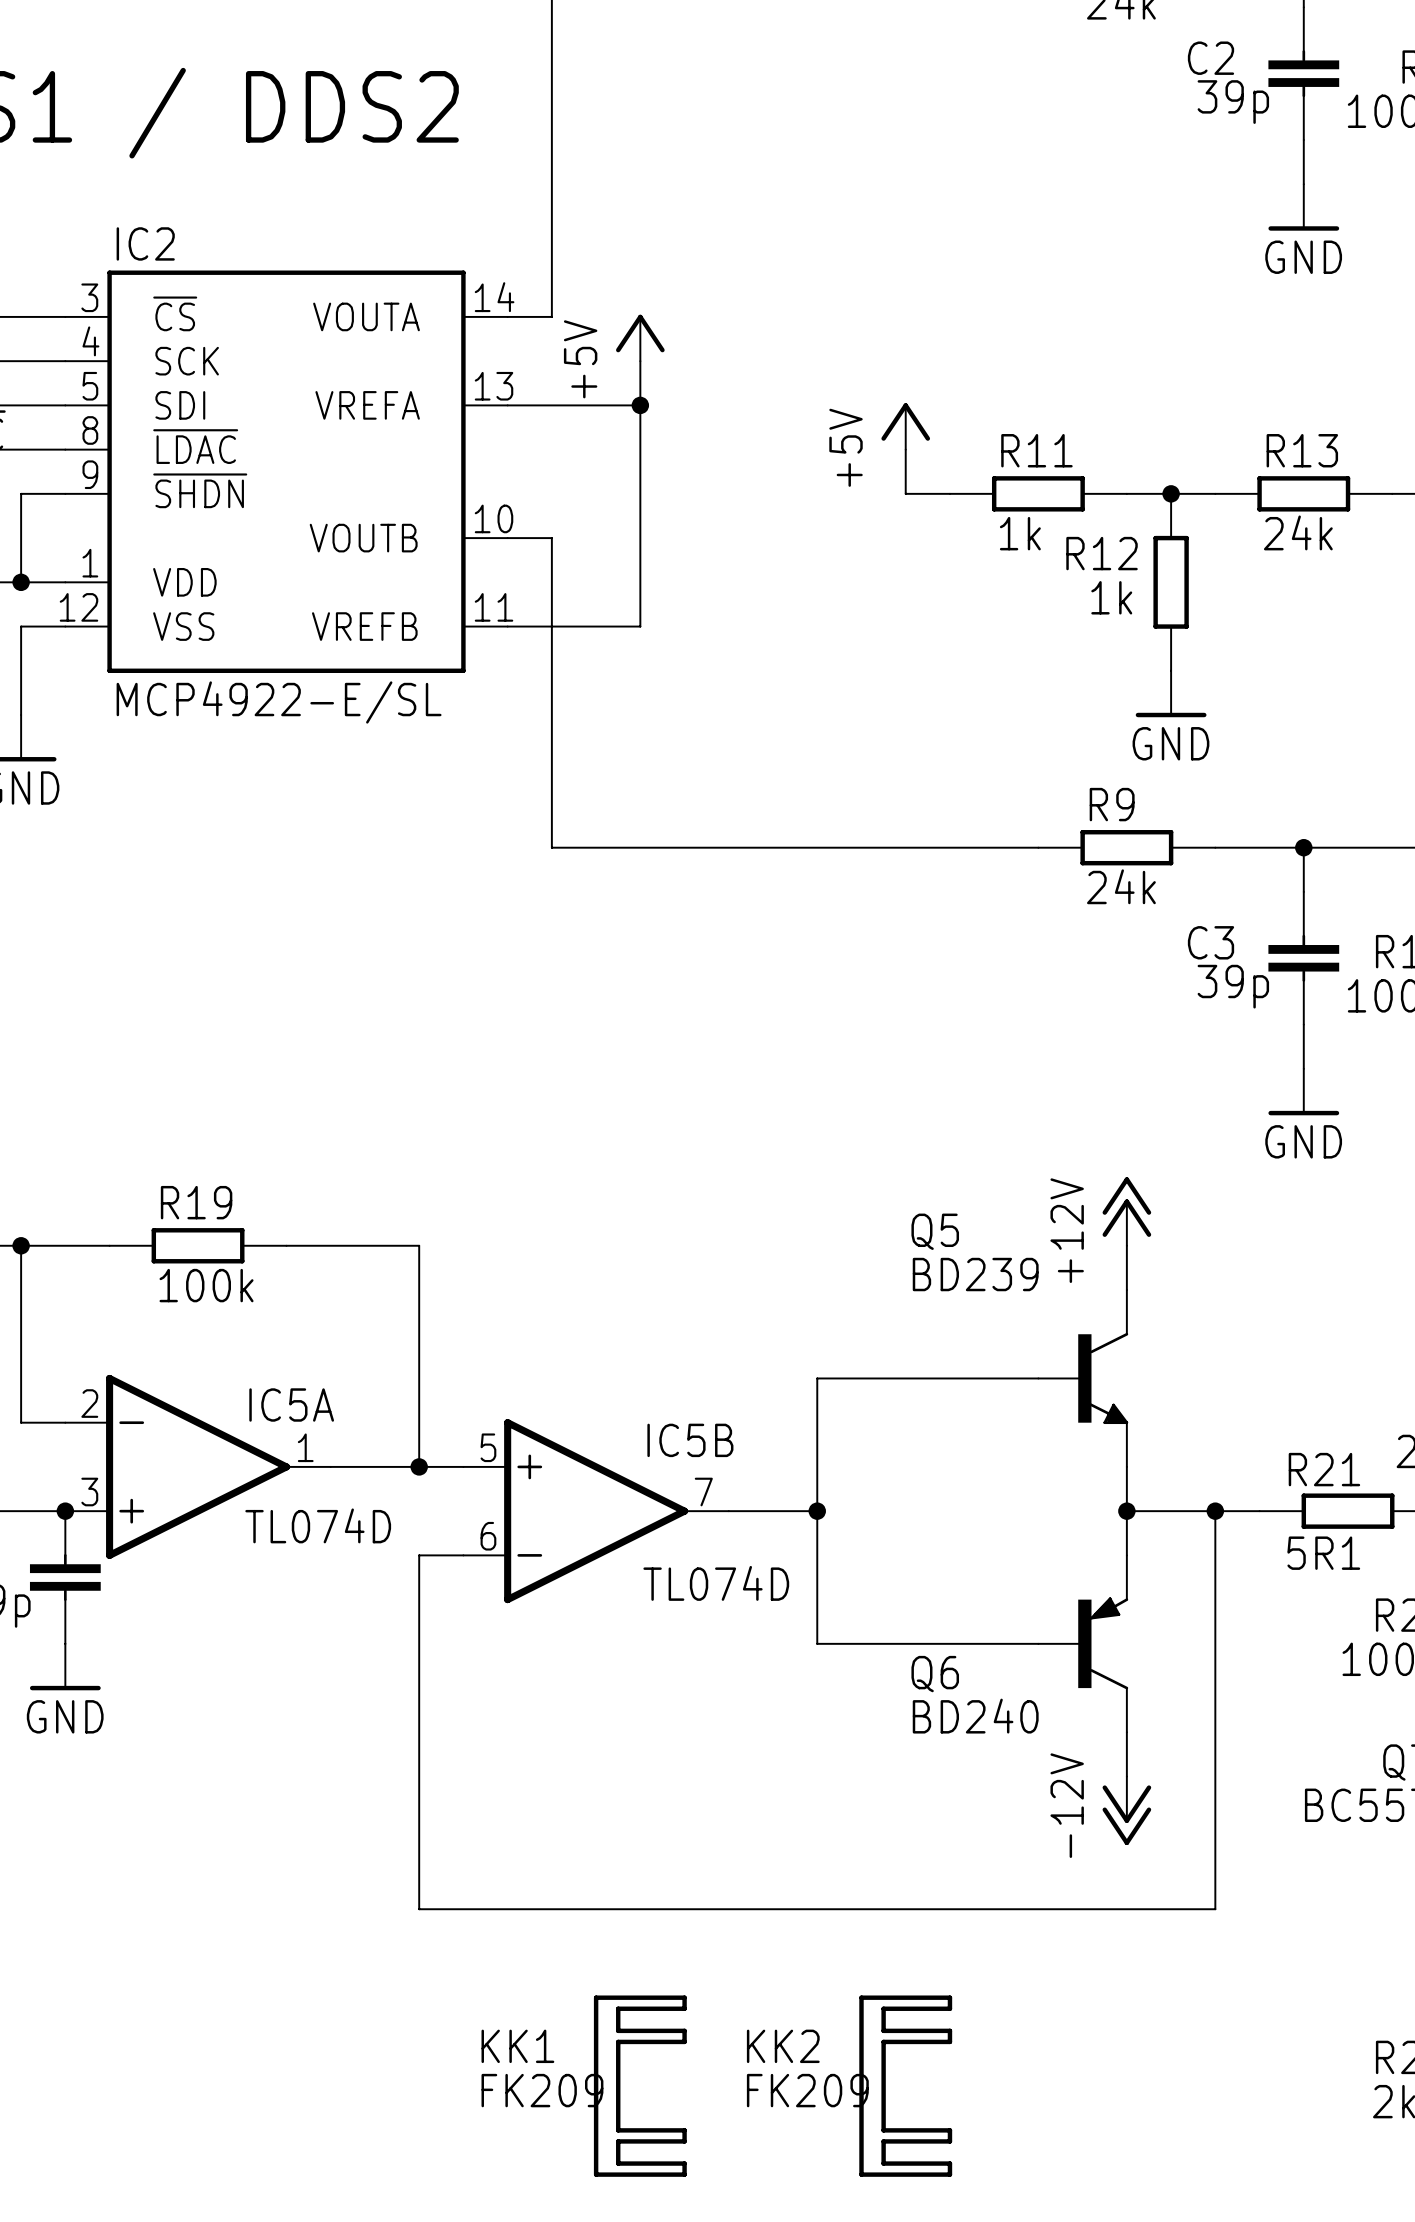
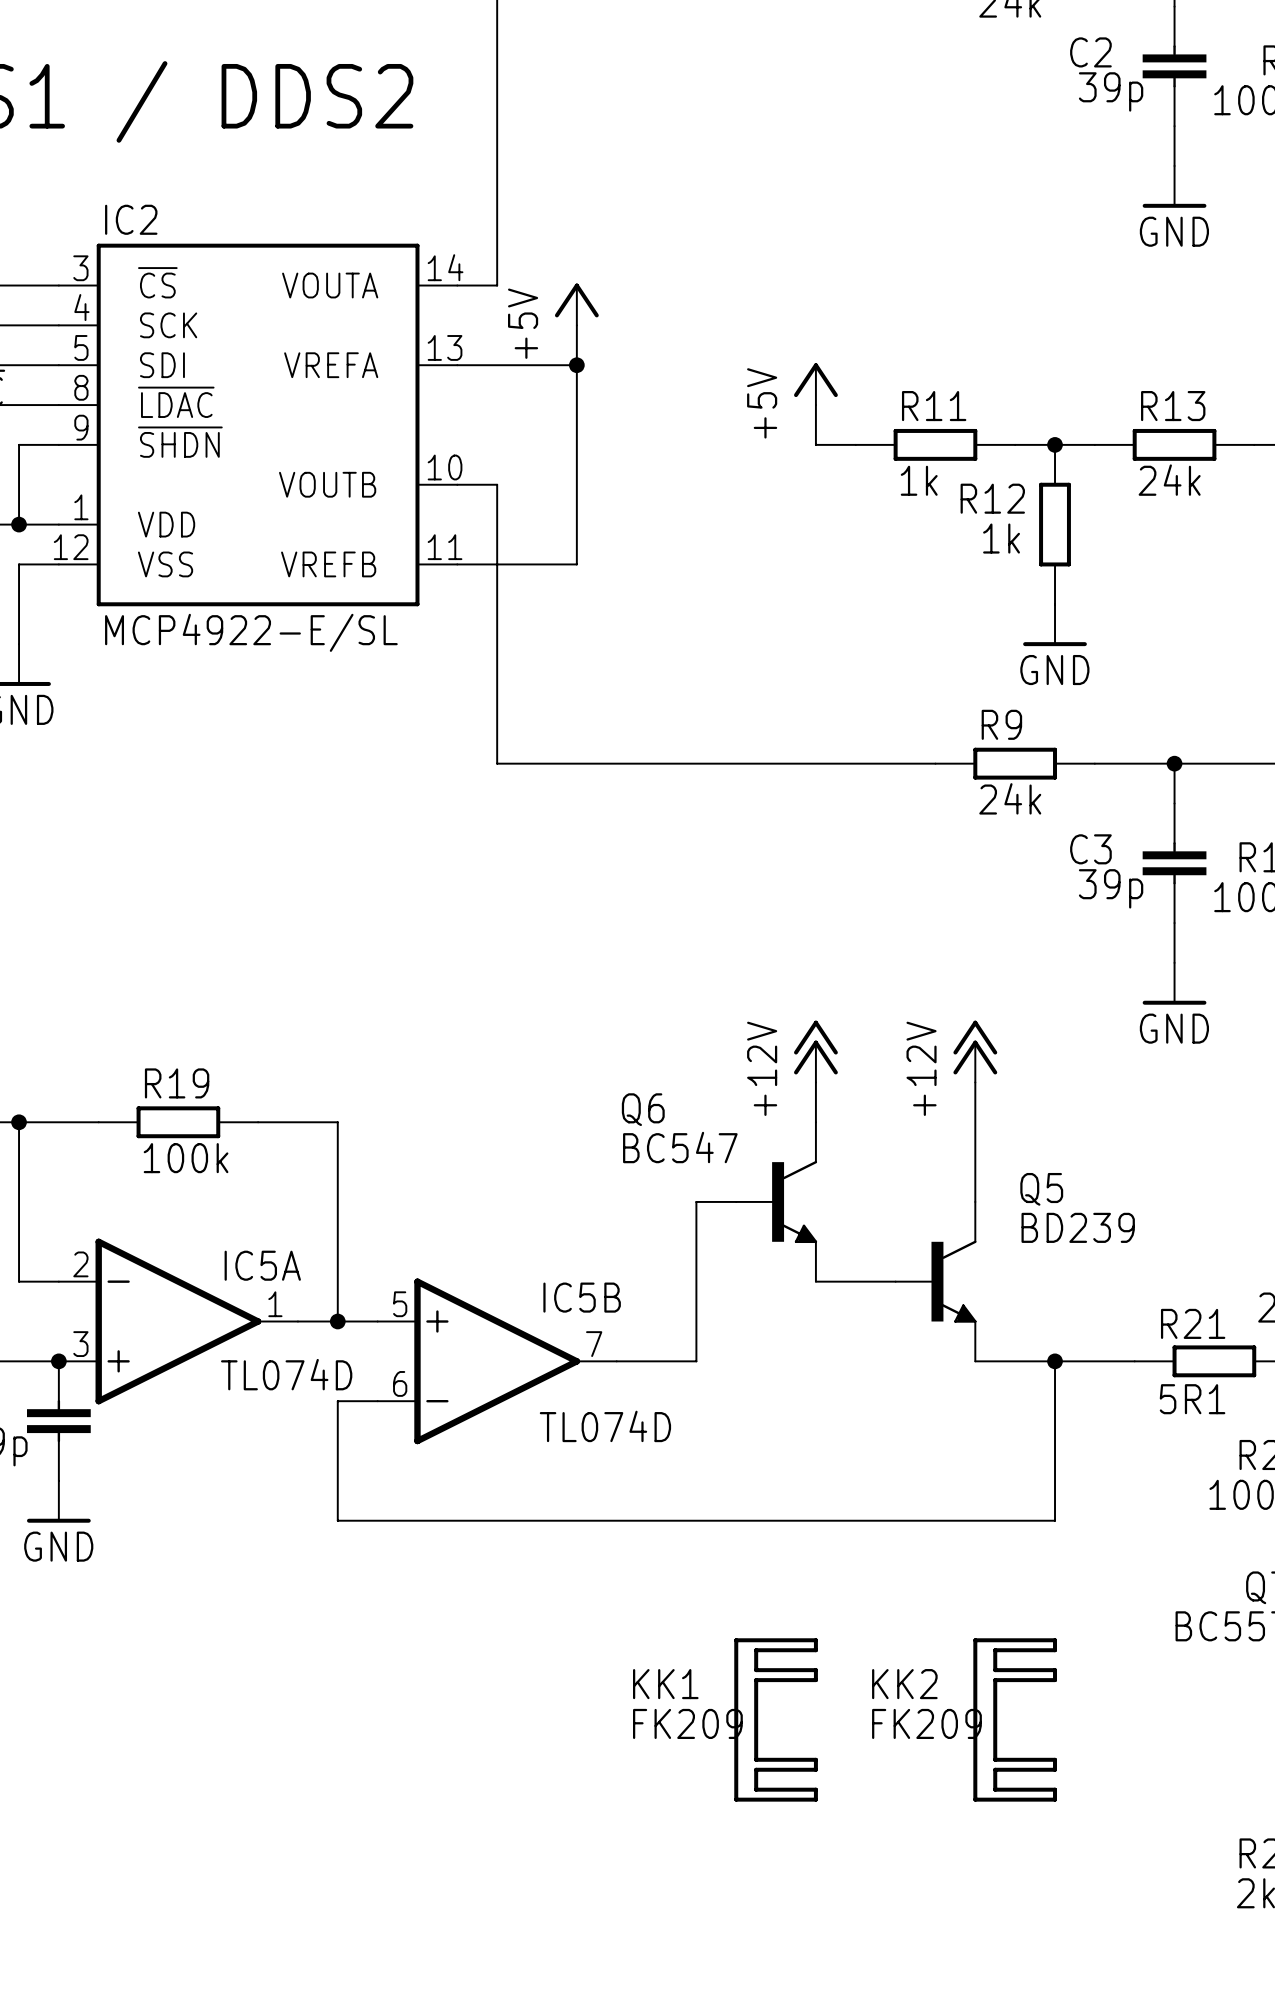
power symbol: none -> +12V (815, 1051)
wire: none -> (975, 1082) (975, 1201)
power symbol position: +12V (1126, 1211) -> +12V (975, 1051)
Q5 name position: Q5 (935, 1231) -> Q5 (1041, 1189)
wire: (374, 1245) (419, 1245) (419, 1466) (463, 1466) -> (337, 1122) (337, 1321)
wire: (1126, 1245) (1126, 1290) -> (815, 1082) (815, 1122)
Q5 value position: BD239 (975, 1274) -> BD239 (1078, 1227)
wire: (1038, 1378) (817, 1378) (817, 1643) (1038, 1643) -> none
Q5 position: (1083, 1378) -> (936, 1281)
wire: none -> (815, 1281) (895, 1281)
junction position: (419, 1466) -> (337, 1321)
wire: (1126, 1466) (1126, 1555) -> none
IC5B position: (596, 1511) -> (497, 1361)
wire: (773, 1511) (817, 1511) -> (696, 1361) (696, 1201) (736, 1201)
junction: (817, 1511) -> none
wire: none -> (975, 1361) (1015, 1361)
junction: (1126, 1511) -> none
wire: none -> (1055, 1361) (1055, 1520) (337, 1520) (337, 1401) (377, 1401)
junction: none -> (1055, 1361)
wire: (1215, 1511) (1215, 1909) (419, 1909) (419, 1555) (463, 1555) -> none
junction: (1215, 1511) -> none
Q6 symbol: [1038, 1555, 1129, 1733] -> [736, 1122, 818, 1282]
Q6 name position: Q6 (935, 1674) -> Q6 (643, 1109)
Q6 value: BD240 (975, 1716) -> BC547 (680, 1147)
wire: (1126, 1732) (1126, 1776) -> none
power symbol: -12V (1126, 1810) -> none
KK1 position: (640, 2086) -> (776, 1719)
KK2 position: (905, 2086) -> (1015, 1719)

